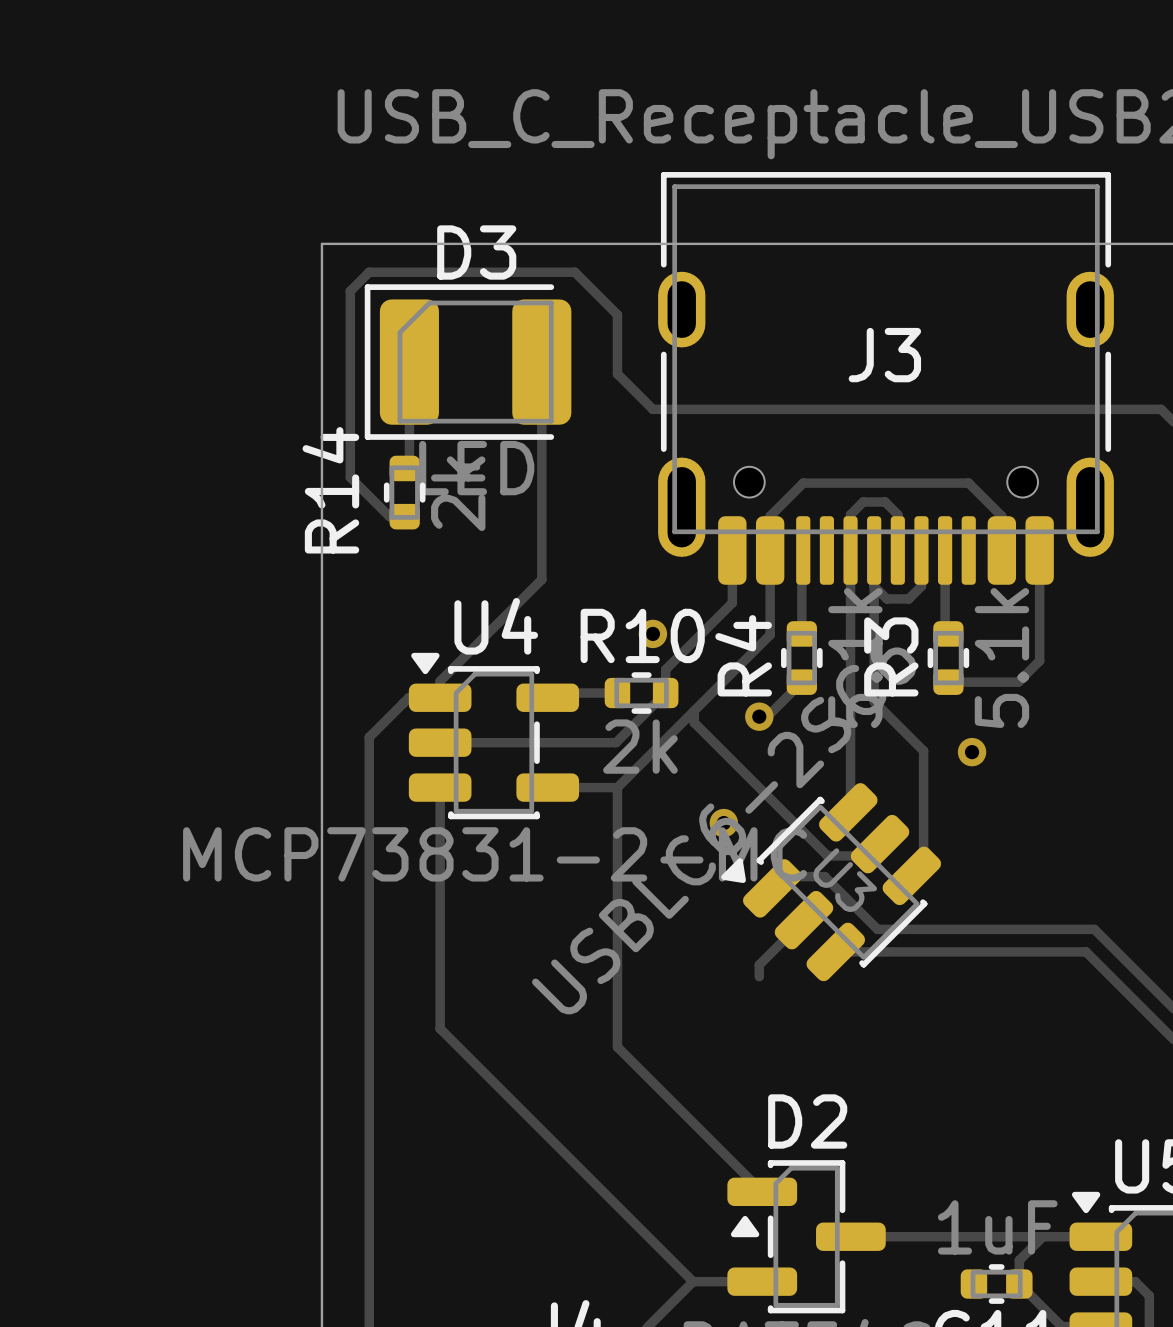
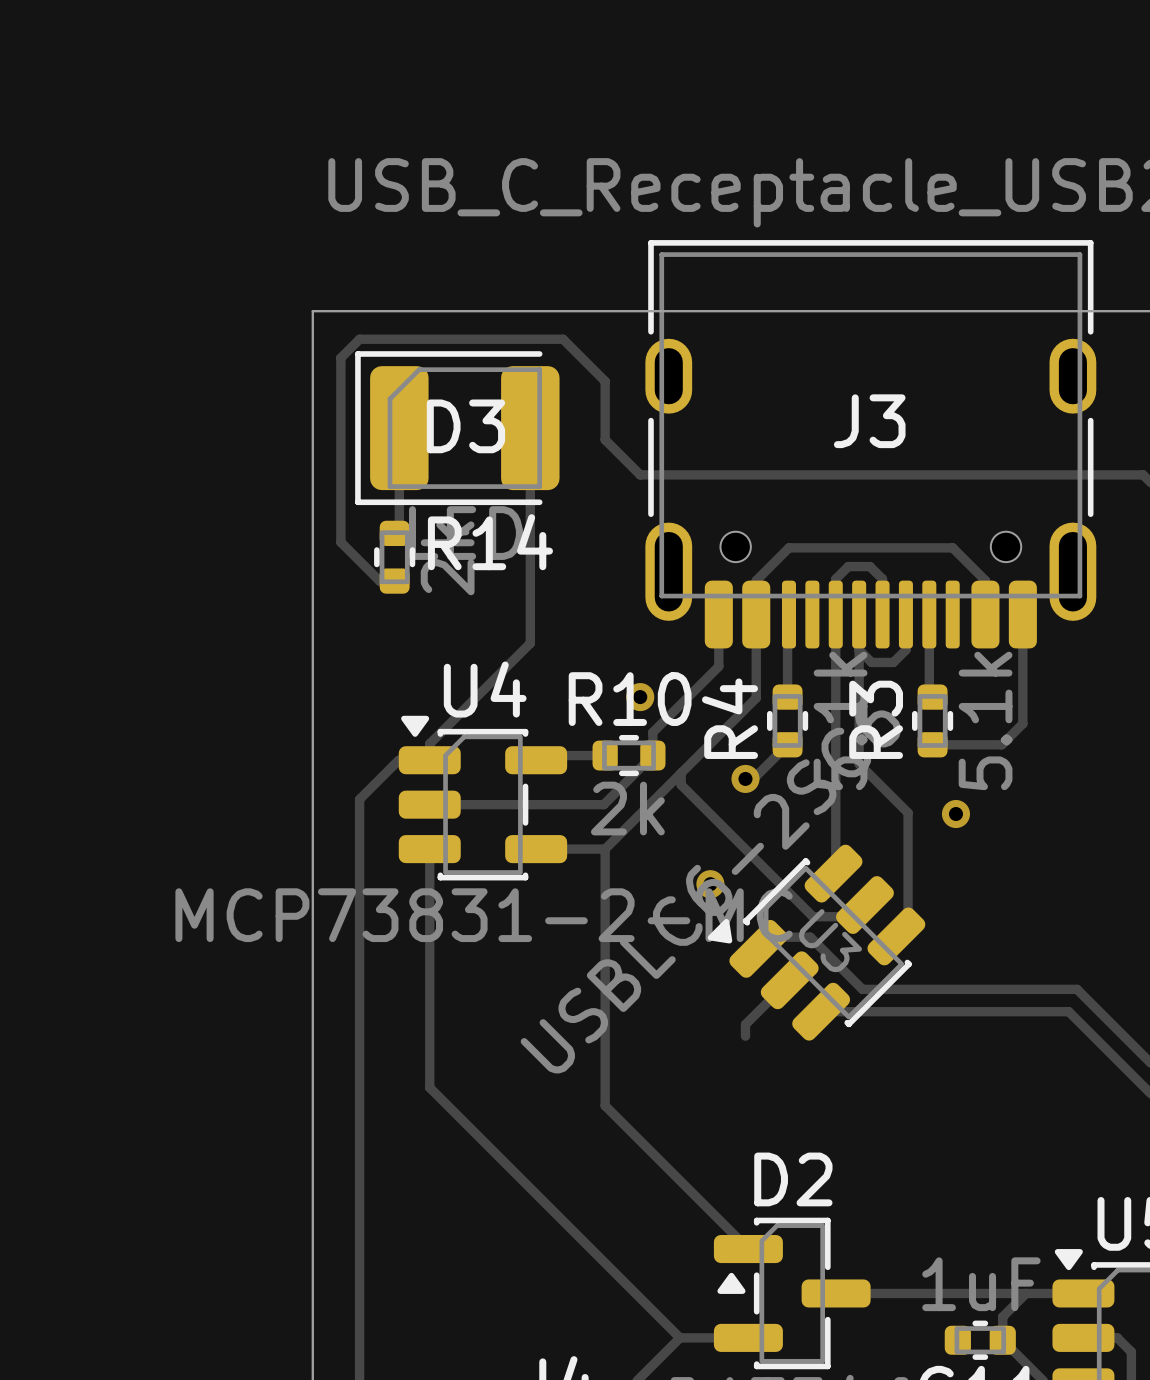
D3 name position: D3 (476, 252) -> D3 (465, 426)
R14 name rotation: 0° (330, 490) -> 90° clockwise (490, 542)

